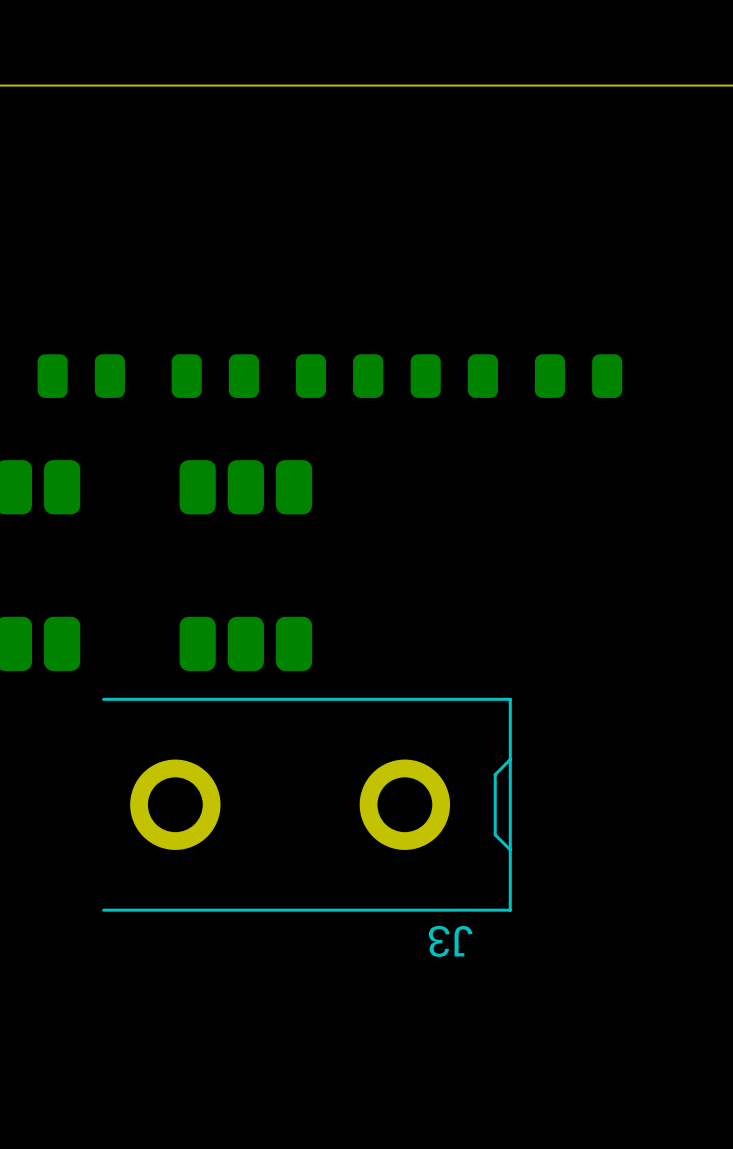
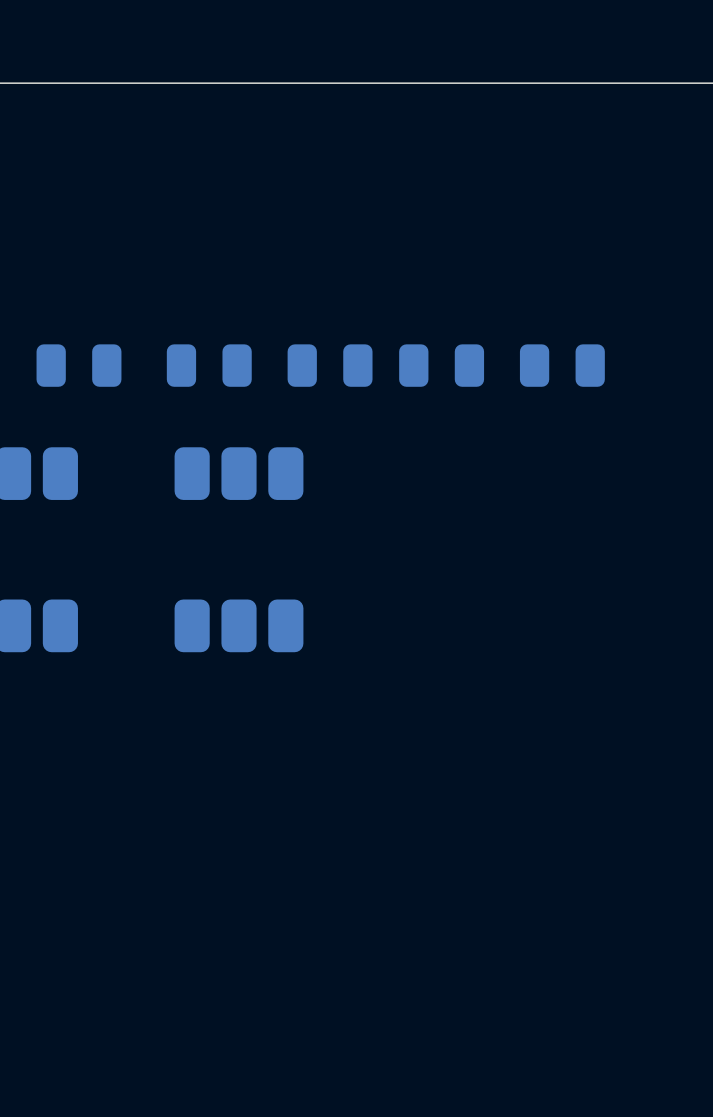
J3: (306, 804) -> none

